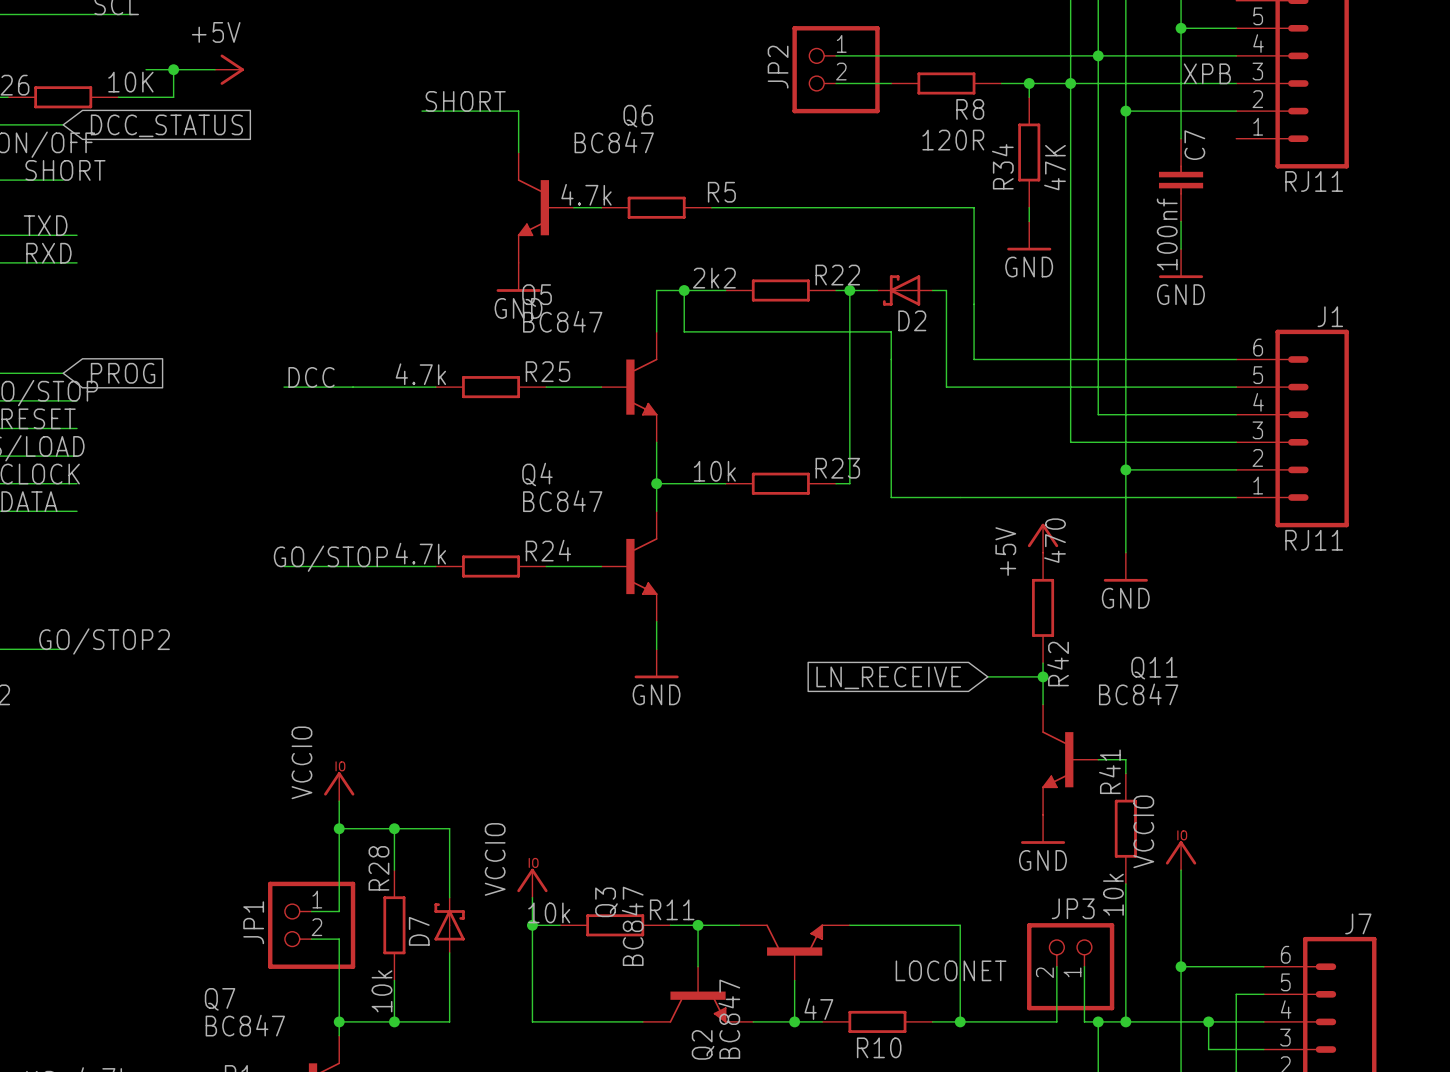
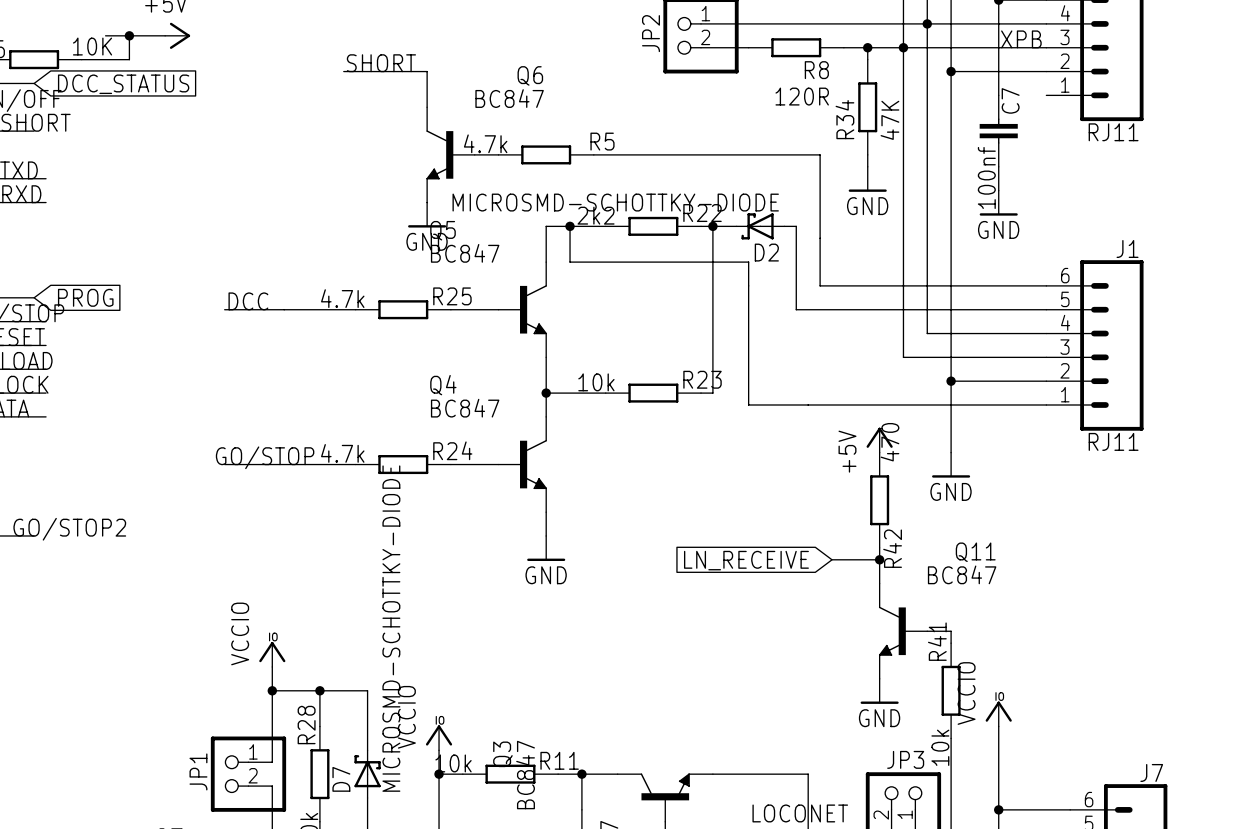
D2 value: none -> MICROSMD-SCHOTTKY-DIODE (615, 202)
D7 value: none -> MICROSMD-SCHOTTKY-DIODE (391, 628)

